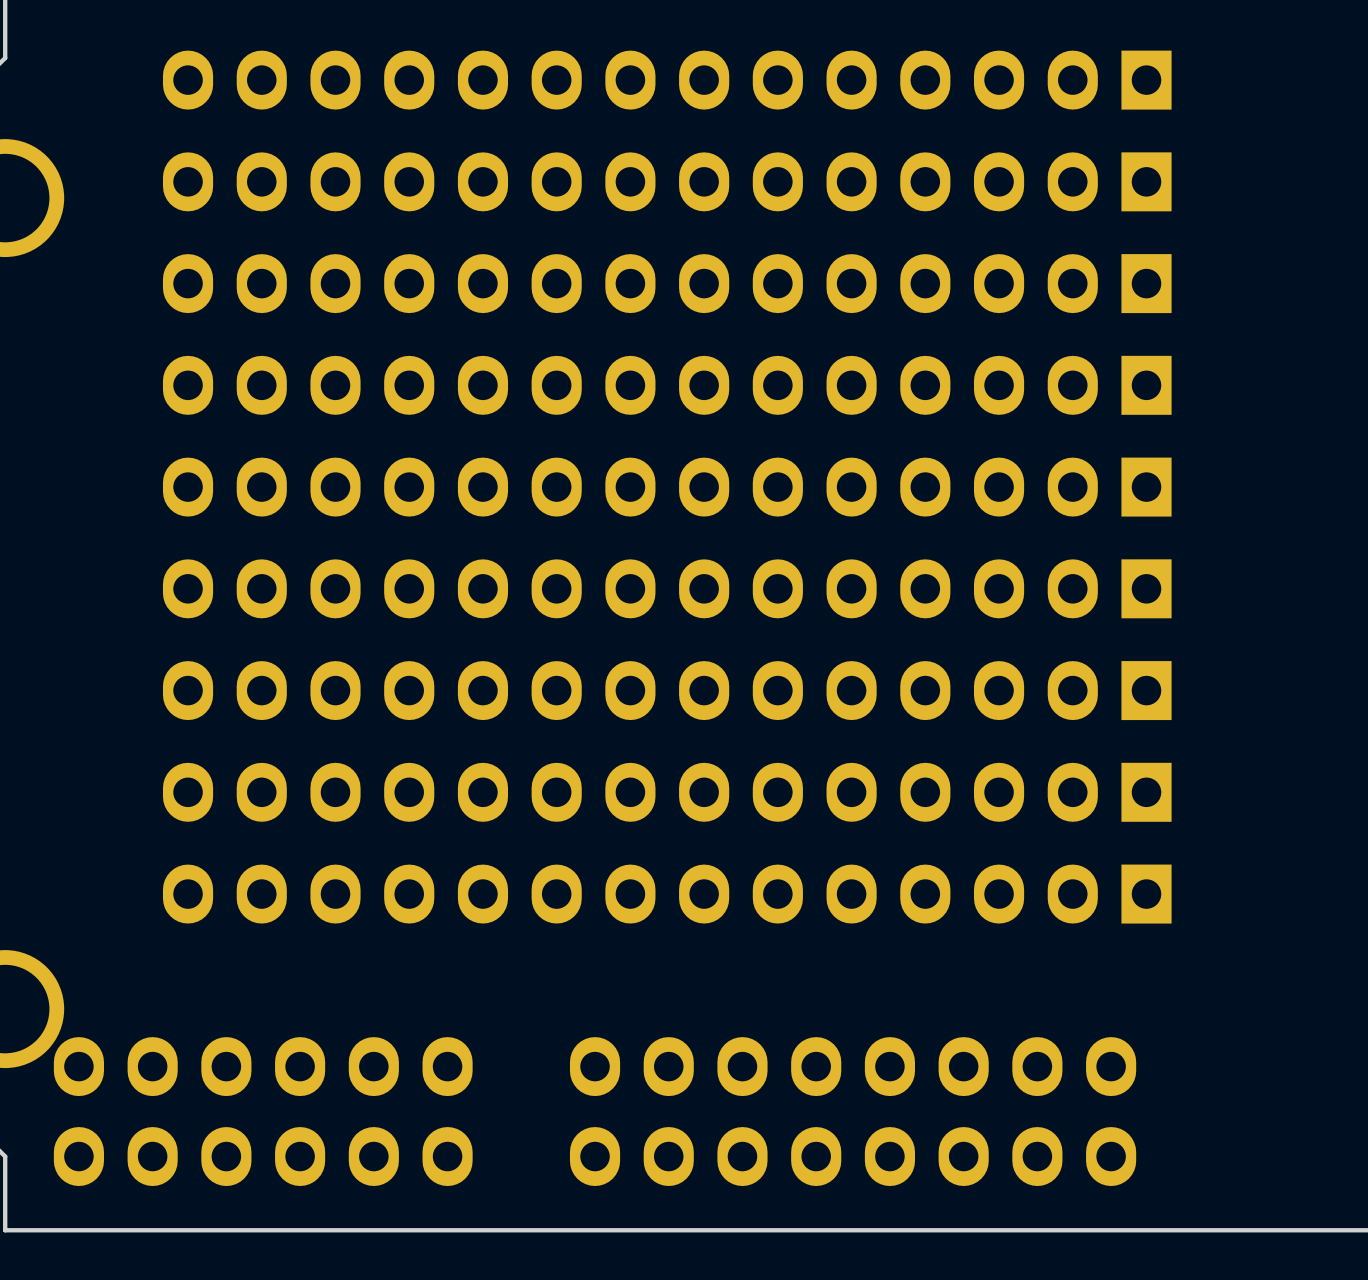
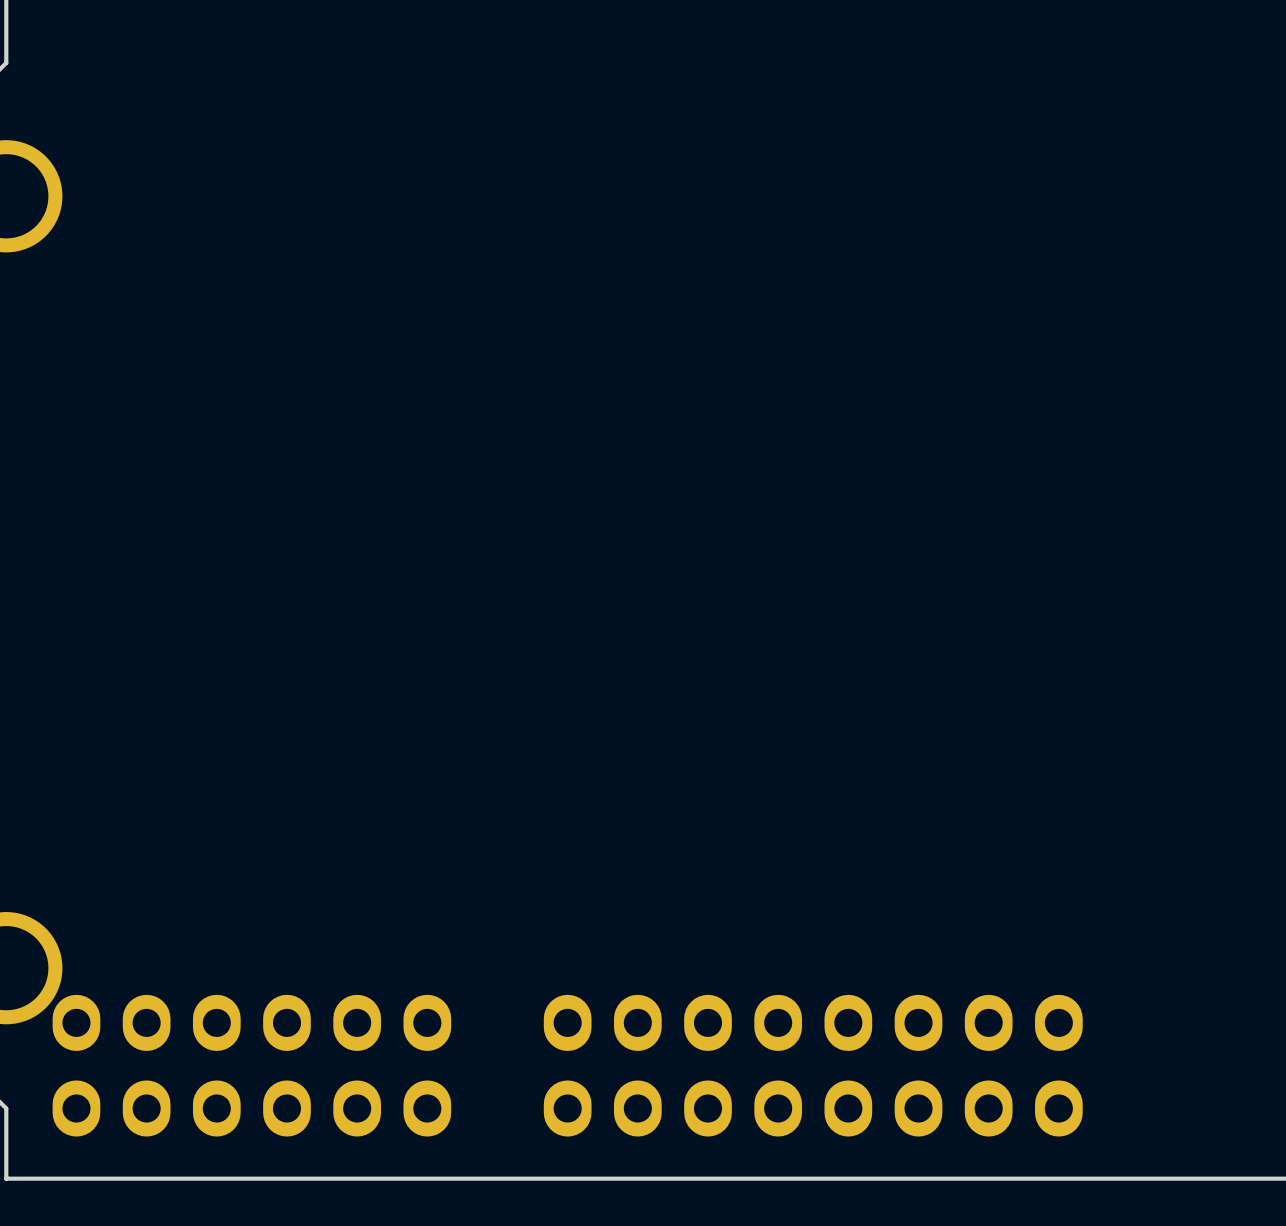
part: (667, 80) -> none
part: (667, 181) -> none
part: (667, 283) -> none
part: (667, 385) -> none
part: (667, 487) -> none
part: (667, 588) -> none
part: (667, 690) -> none
part: (667, 792) -> none
part: (667, 894) -> none

